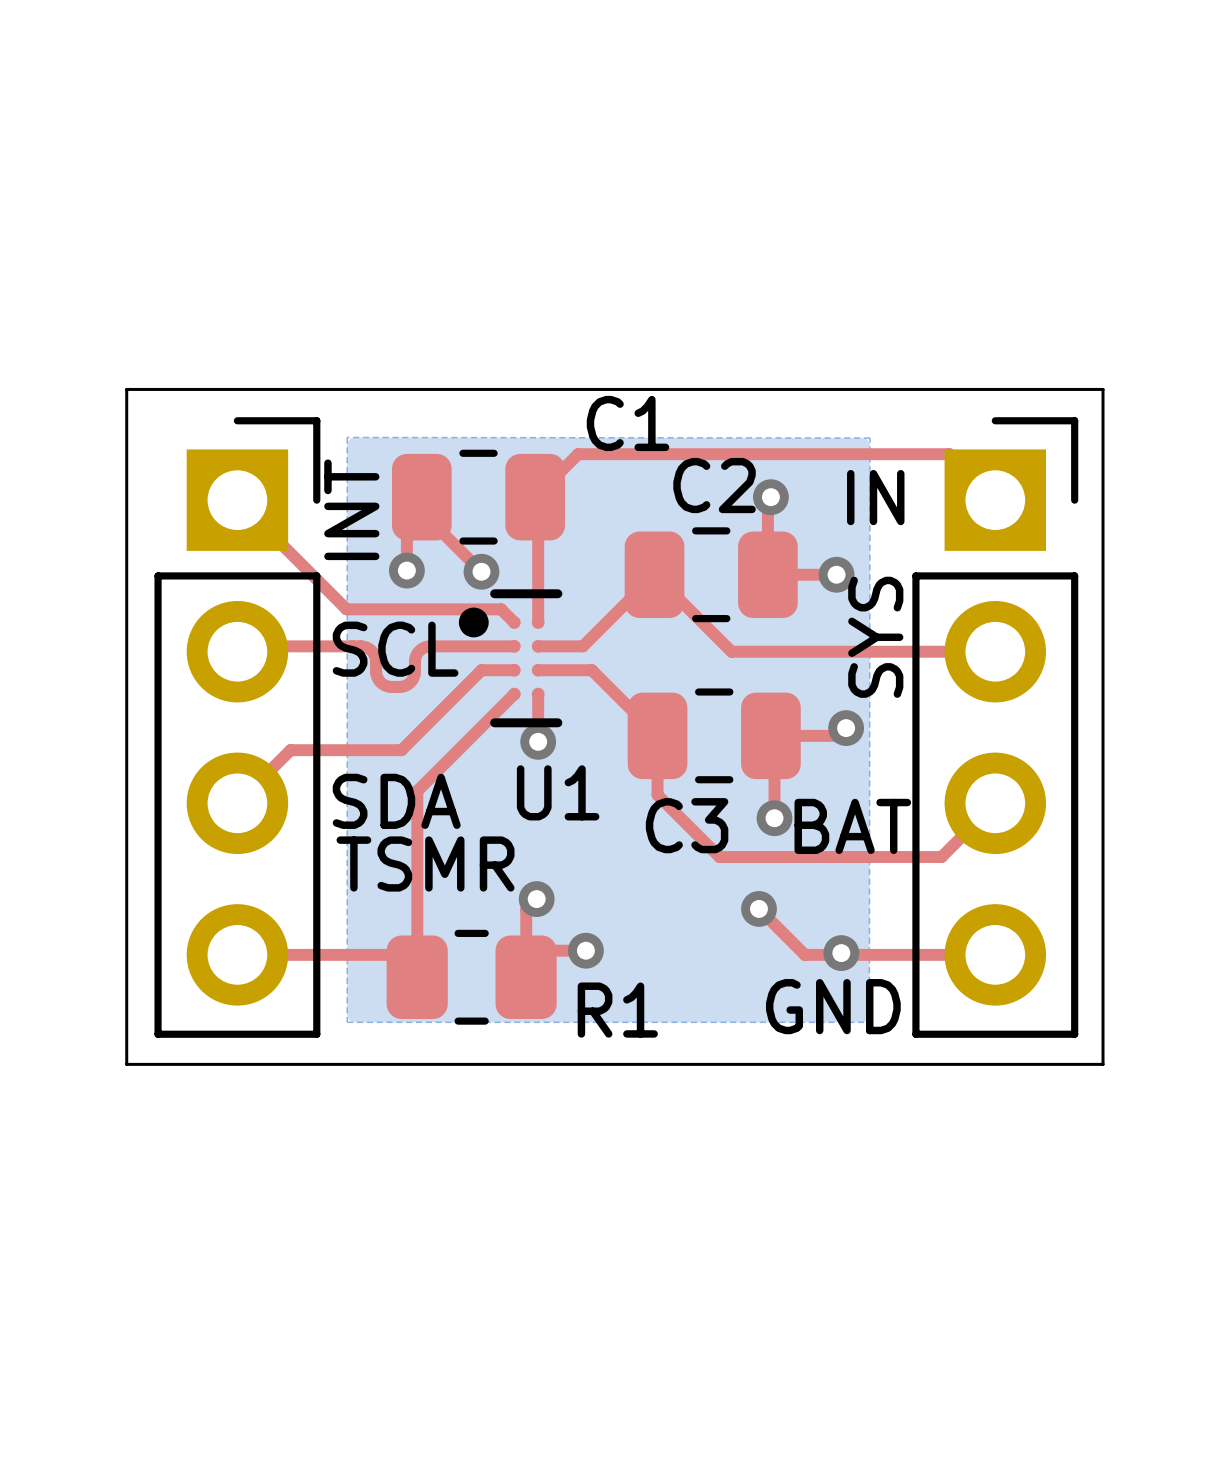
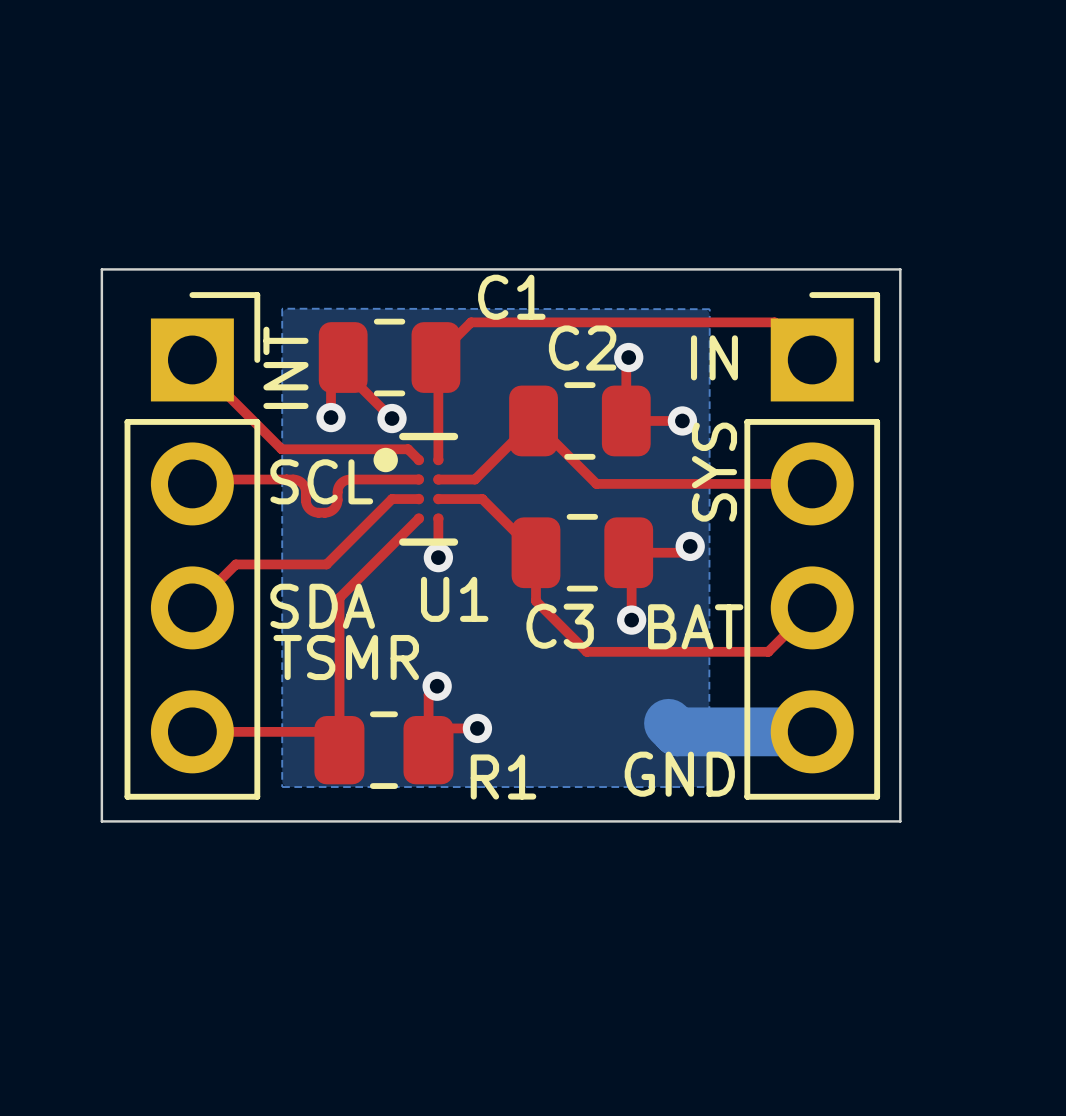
top track: (758, 908) (804, 954) (839, 954) (841, 953) (843, 954) (995, 954) -> none
via: (758, 908) -> none
bottom track: none -> (668, 723) (677, 731) (812, 731)
via: (841, 953) -> none

